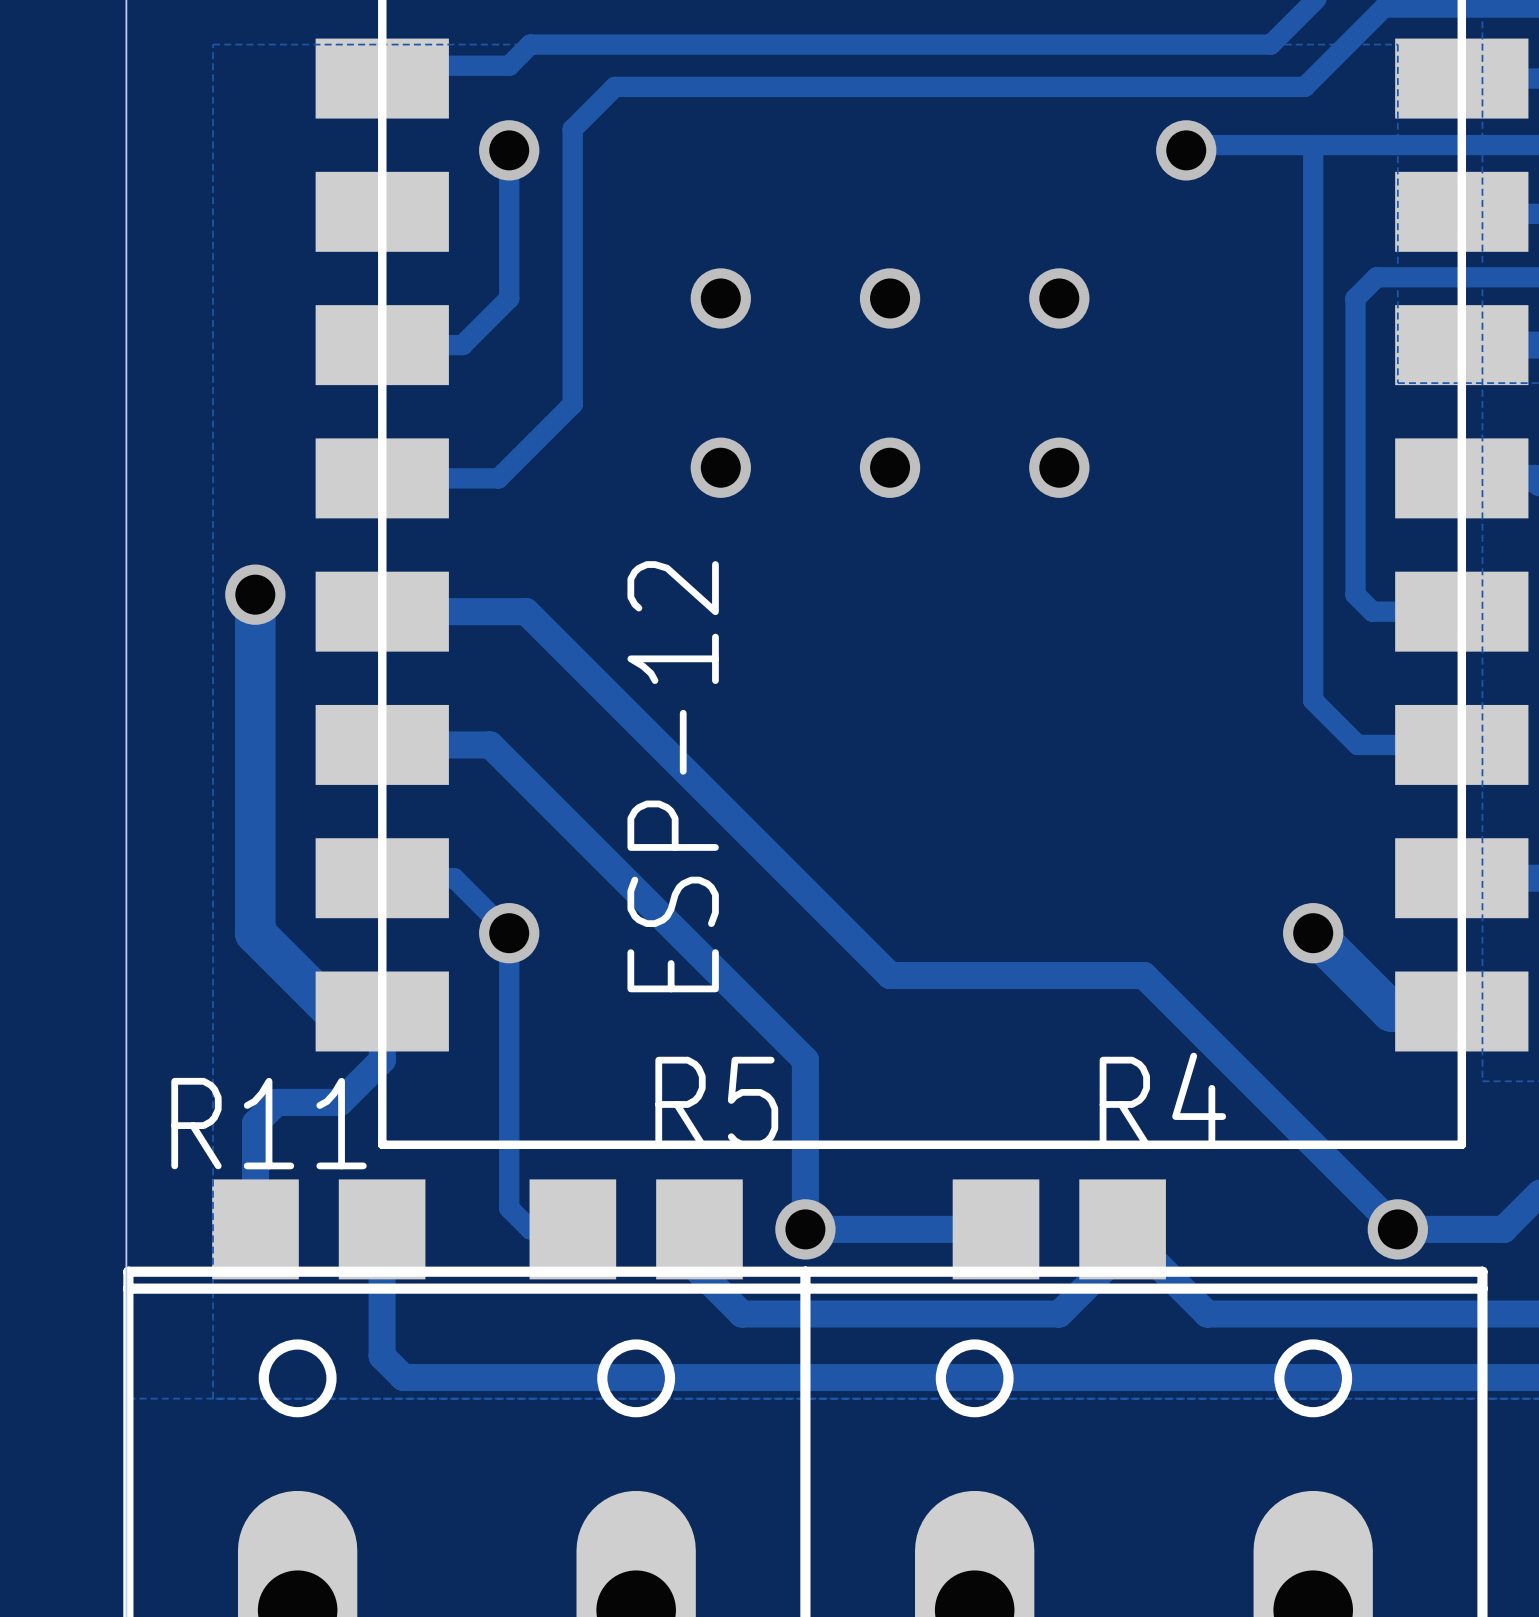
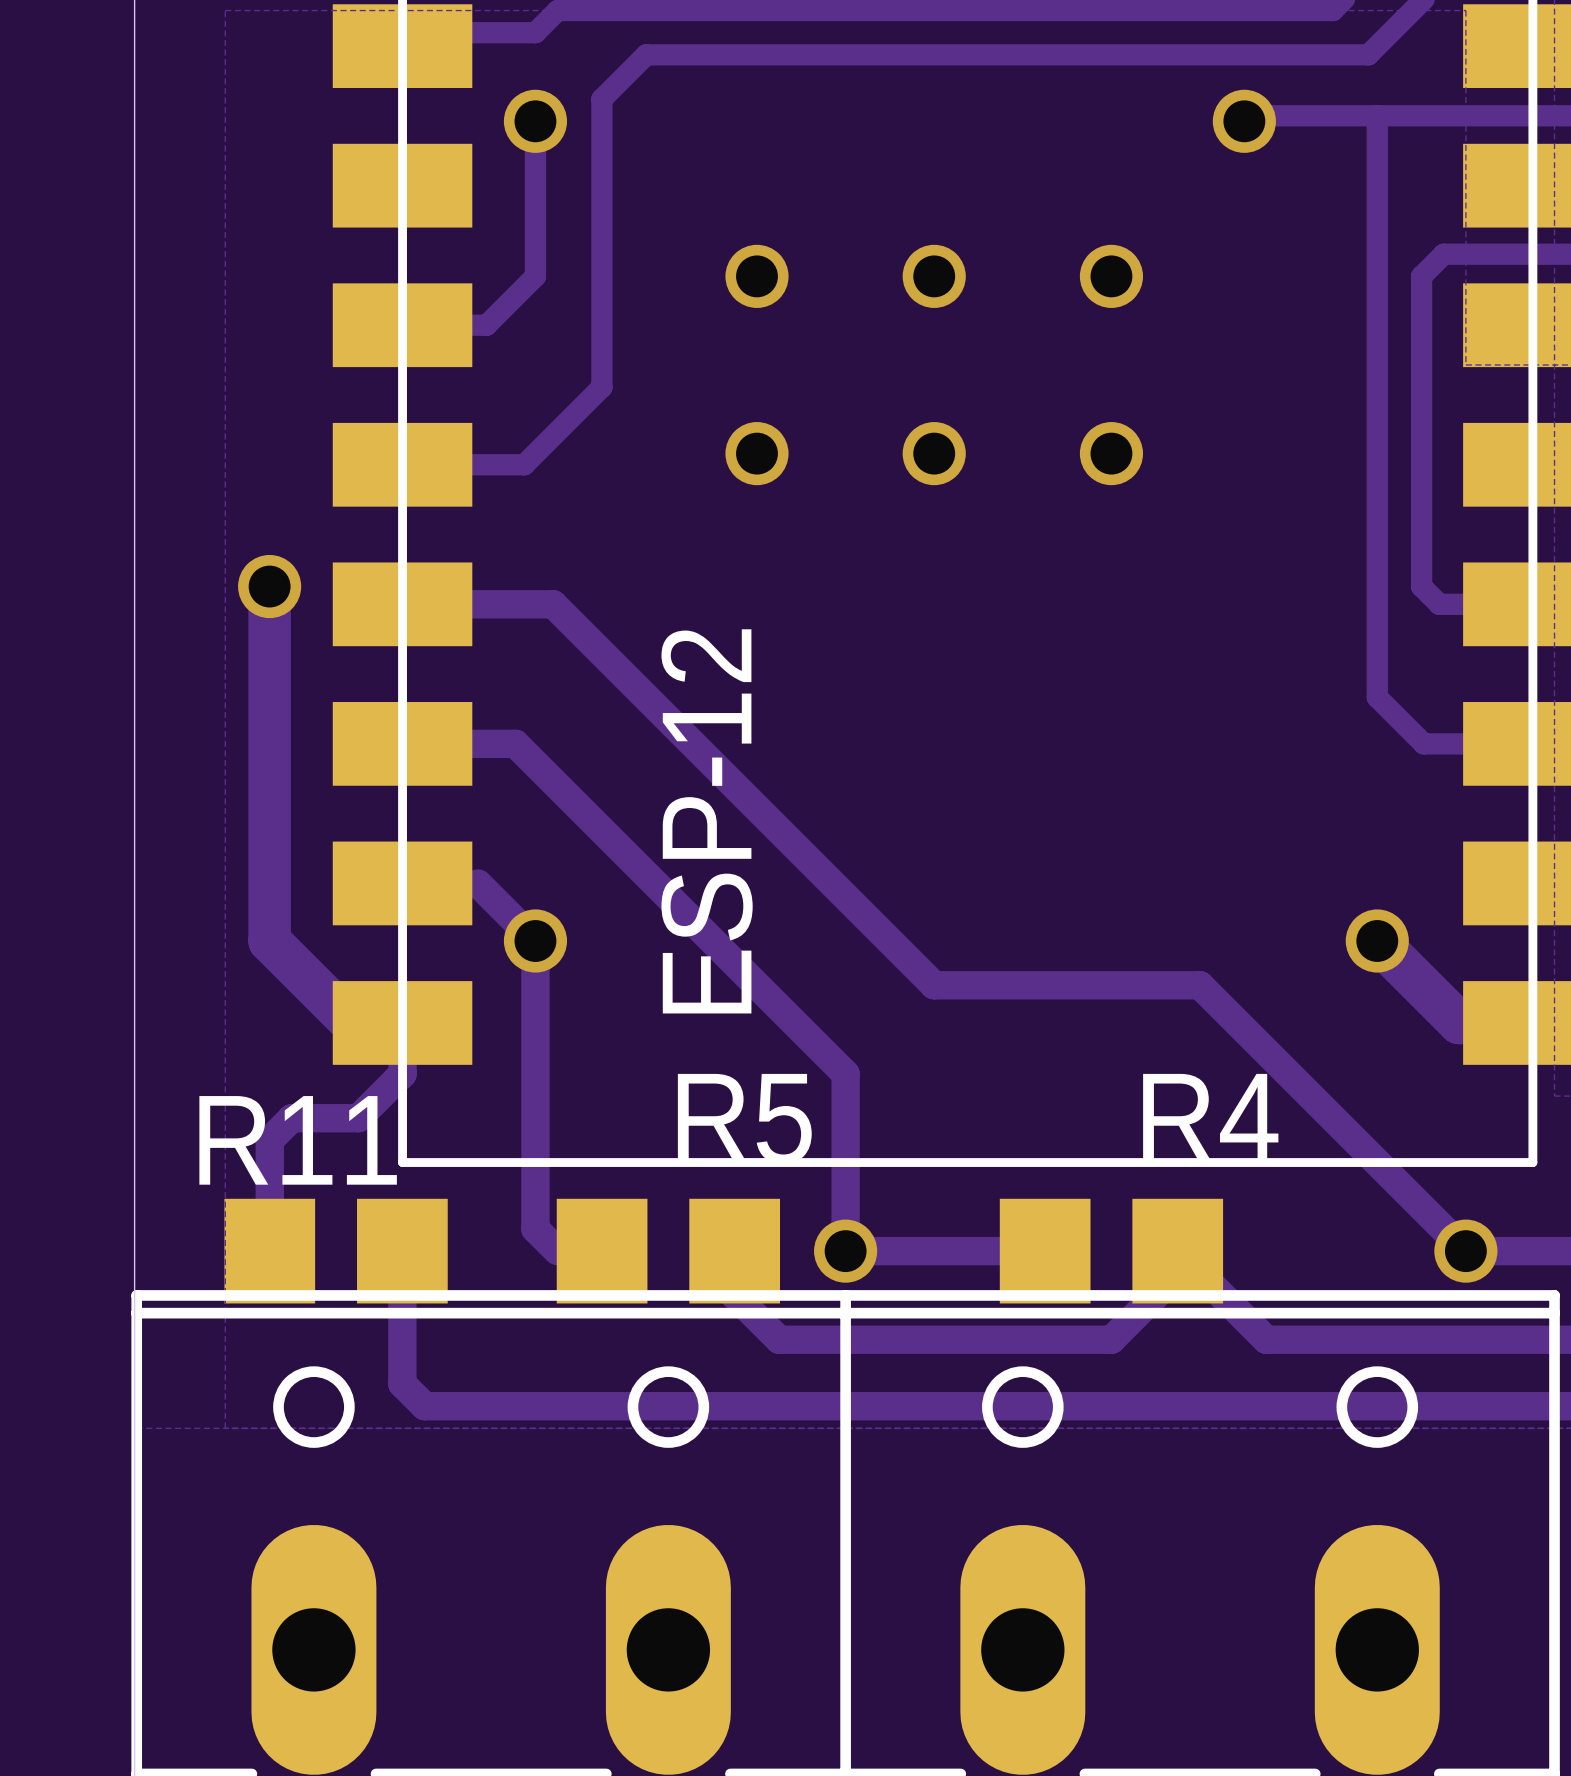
track width: thin (454, 878) (509, 933) (509, 1208) (530, 1229) -> thick (477, 883) (535, 940) (535, 1228) (557, 1251)

